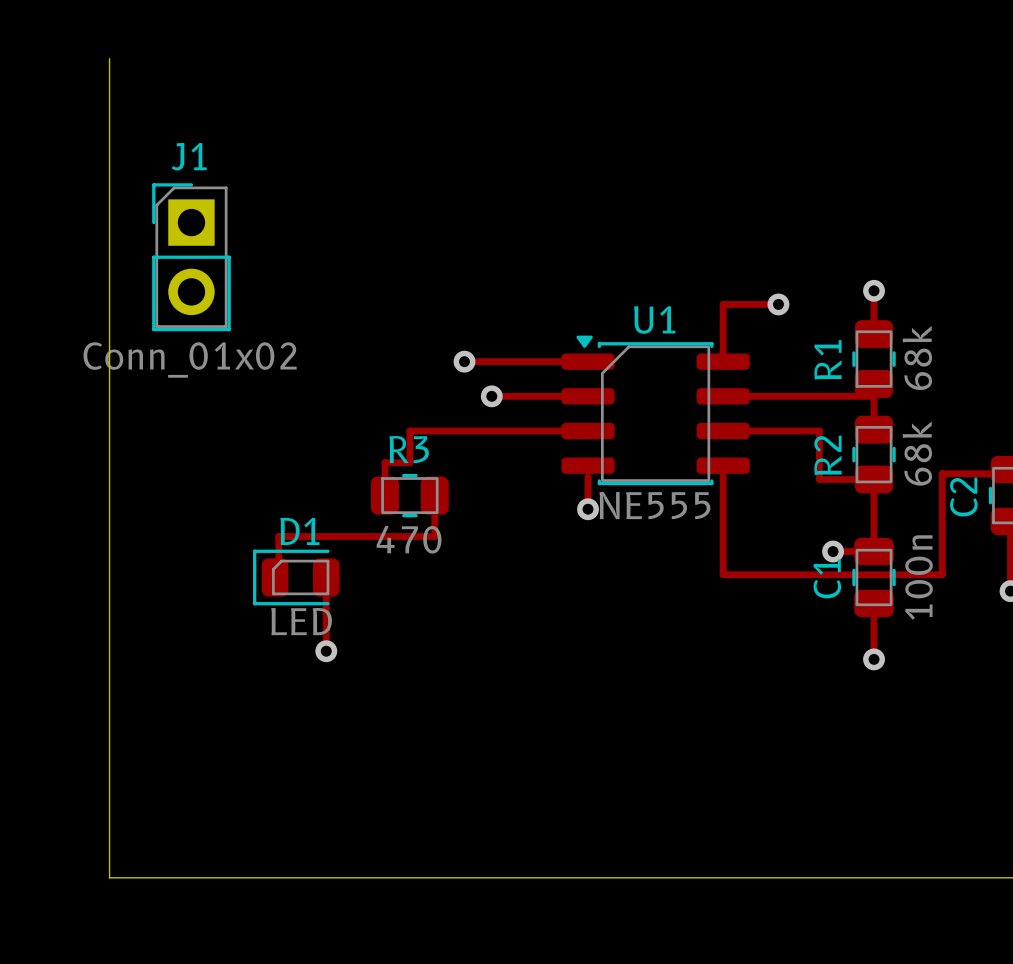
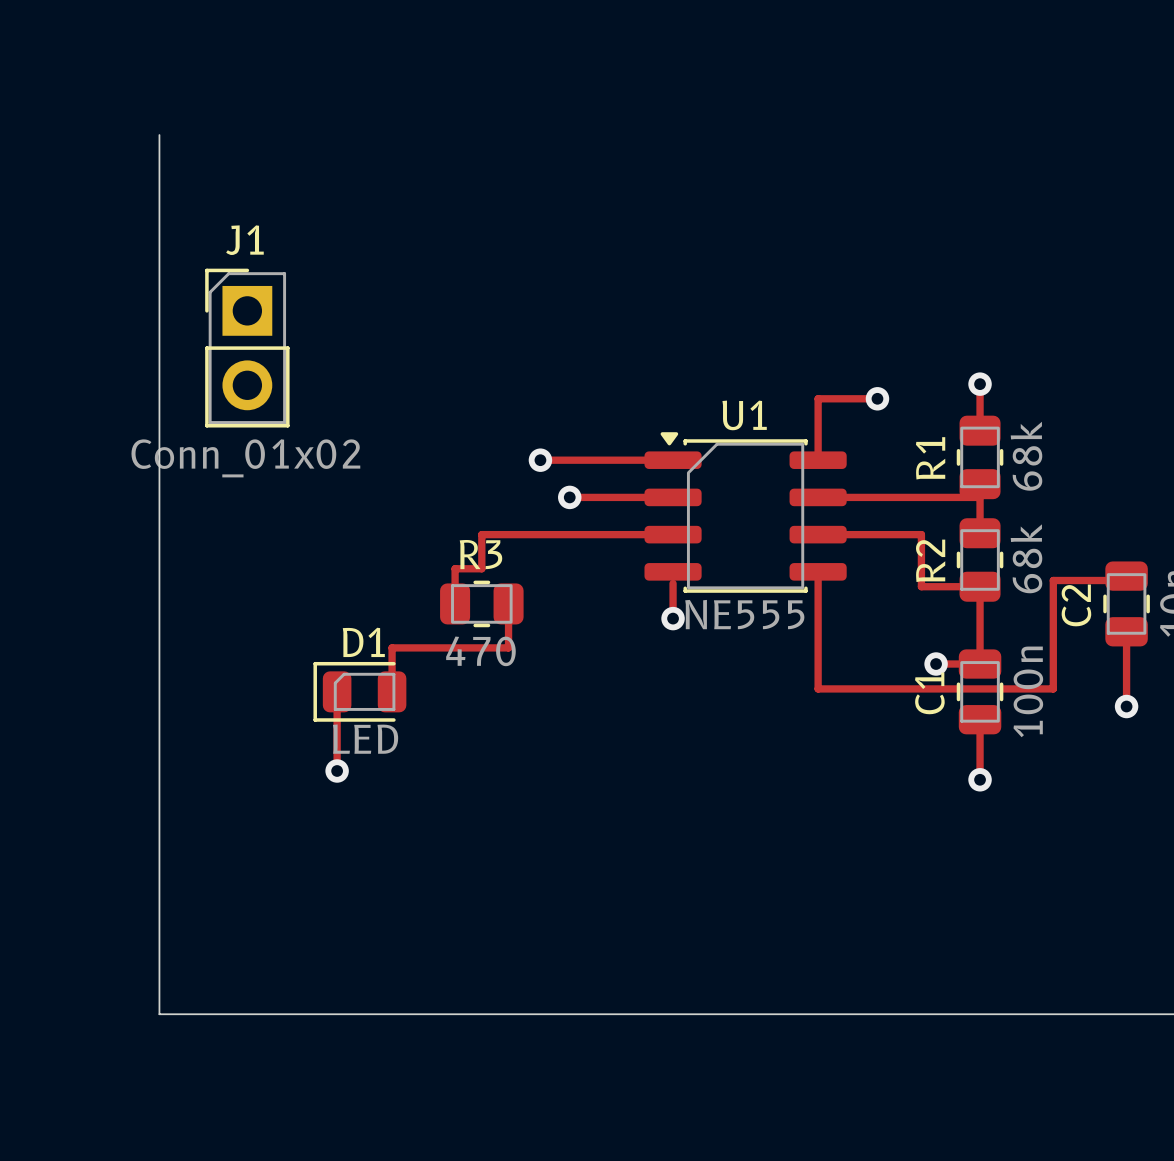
track: (326, 536) (278, 536) (278, 574) -> (392, 647) (392, 688)
track: (326, 591) (326, 651) -> (337, 706) (337, 770)
via position: (326, 651) -> (337, 770)

